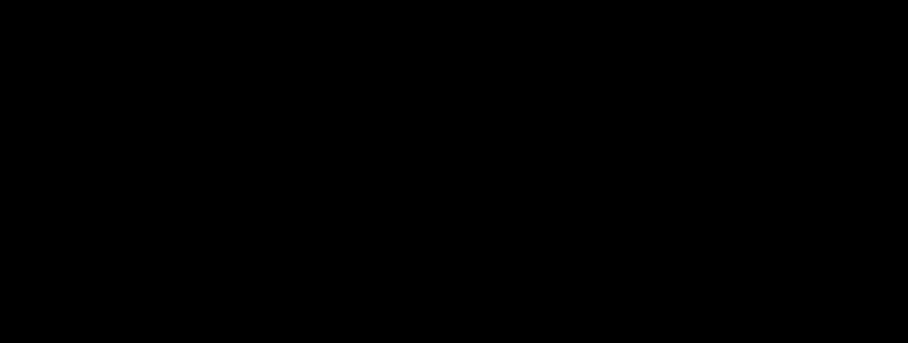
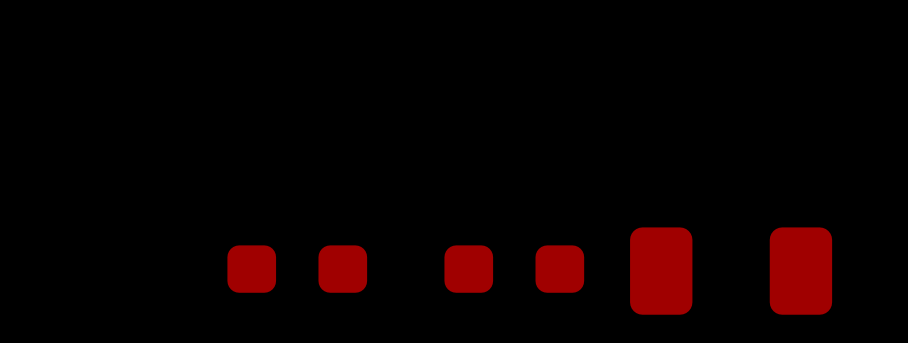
part: none -> (297, 269)
part: none -> (514, 269)
part: none -> (731, 271)

